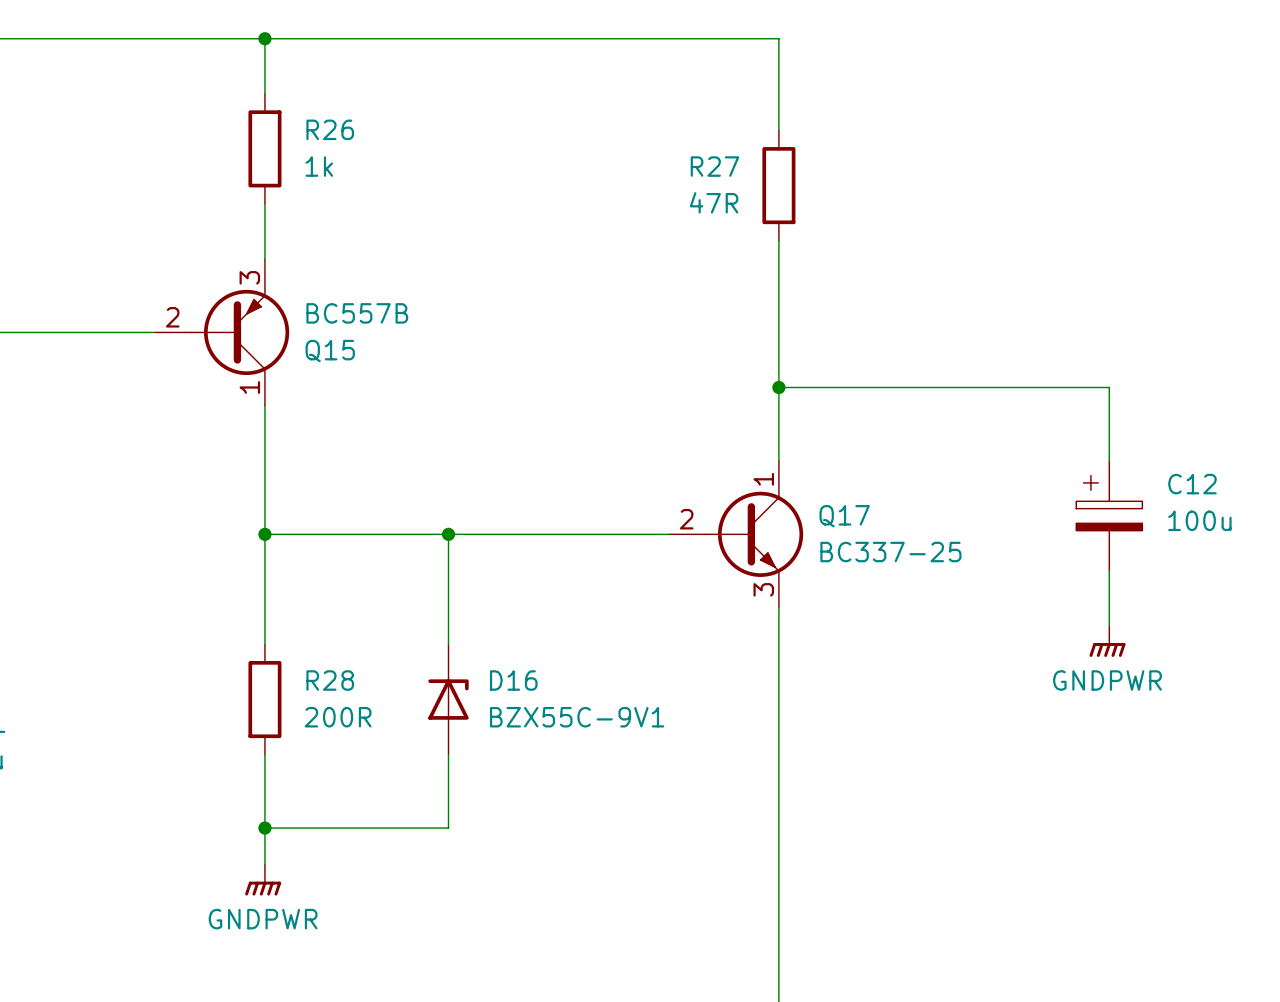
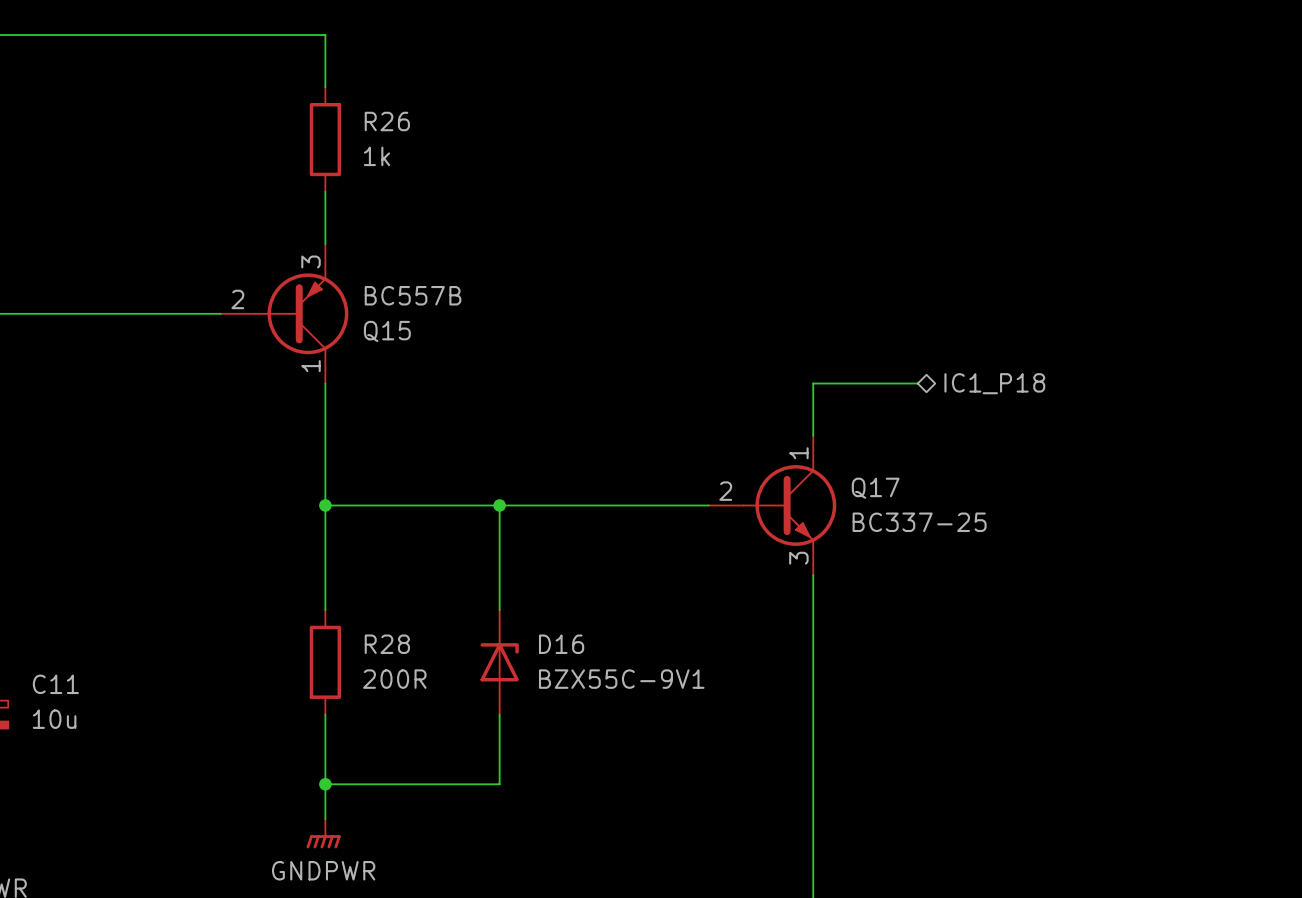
wire: (264, 38) (778, 38) (778, 130) -> none
junction: (264, 38) -> none
R27: 47R (778, 185) -> none
wire: (778, 240) (778, 405) -> (917, 383) (813, 383)
wire: (778, 387) (1109, 387) (1109, 460) -> none
junction: (778, 387) -> none
hierarchical label: none -> IC1_P18 (994, 383)
C12: 100u (1109, 515) -> none
wire: (1109, 571) (1109, 626) -> none
power symbol: GNDPWR (1107, 641) -> none

